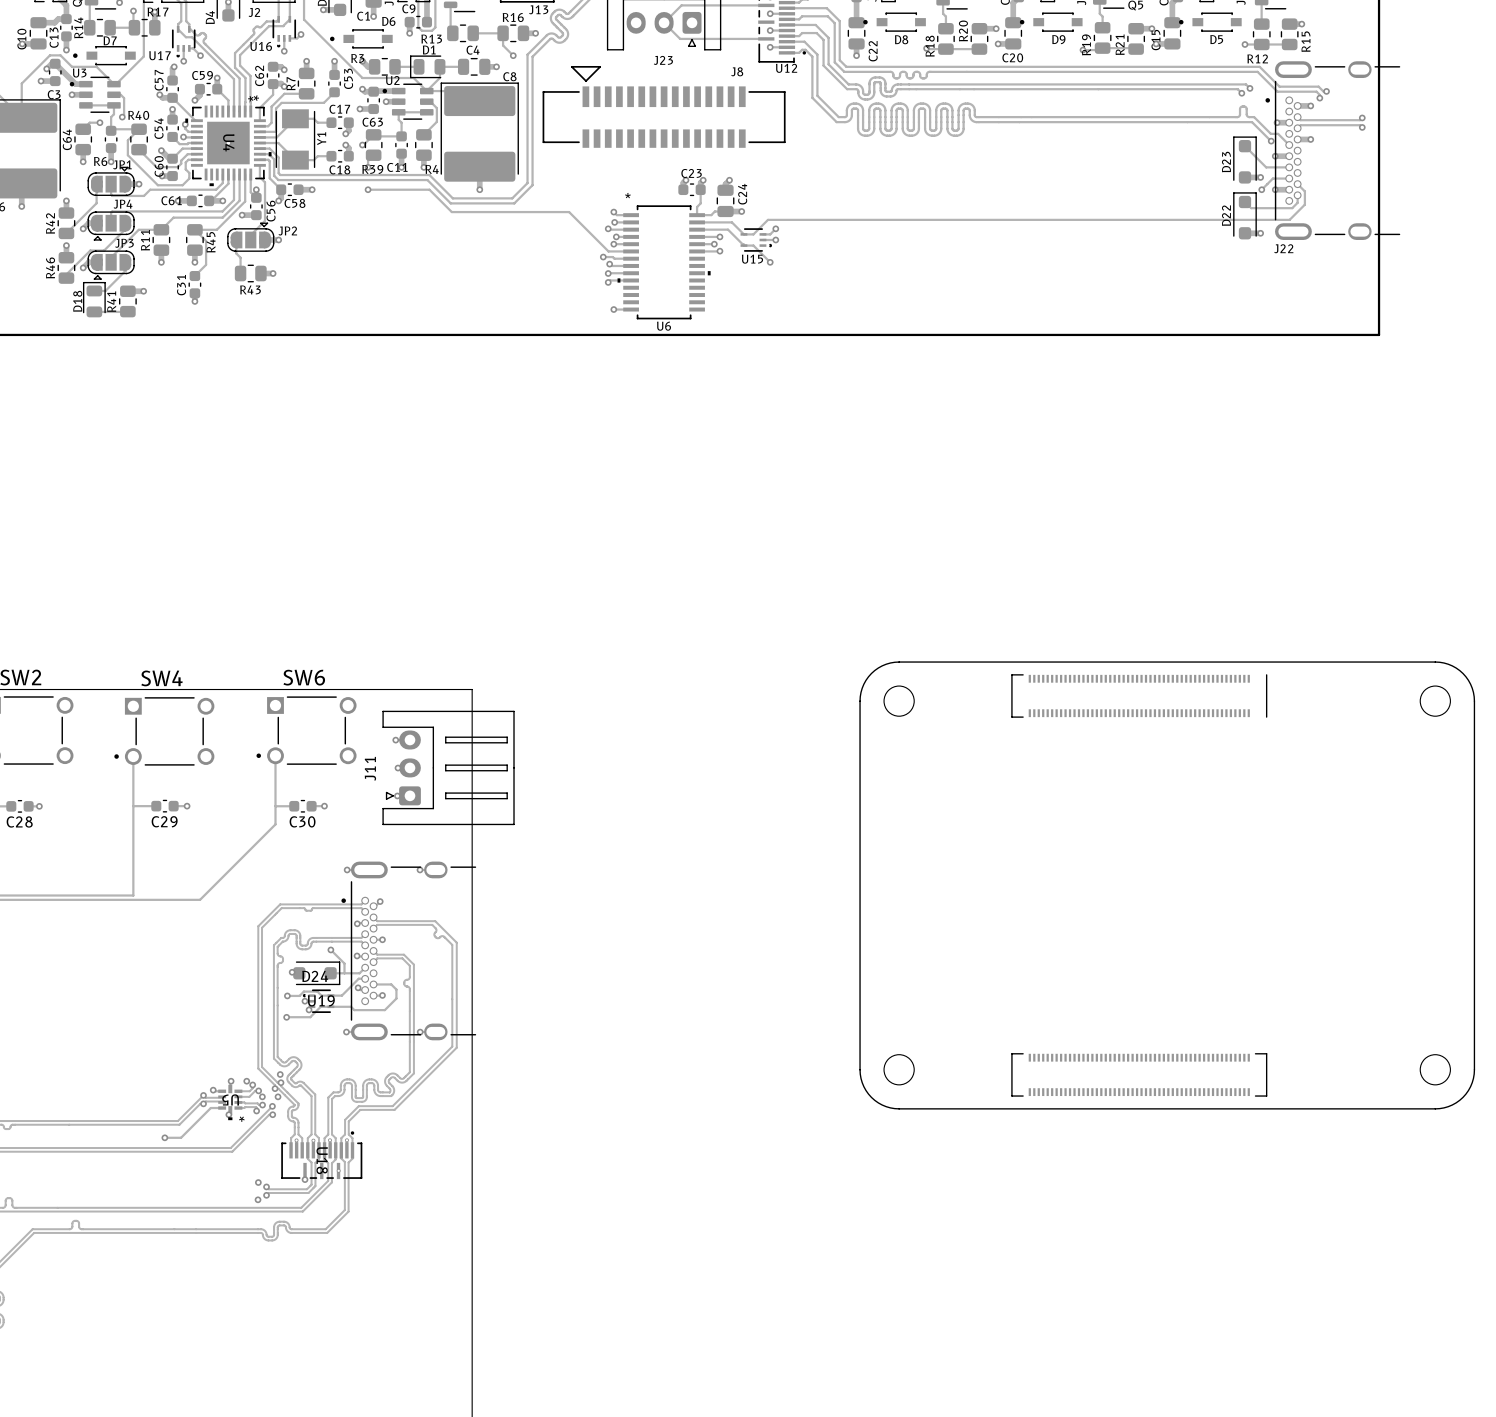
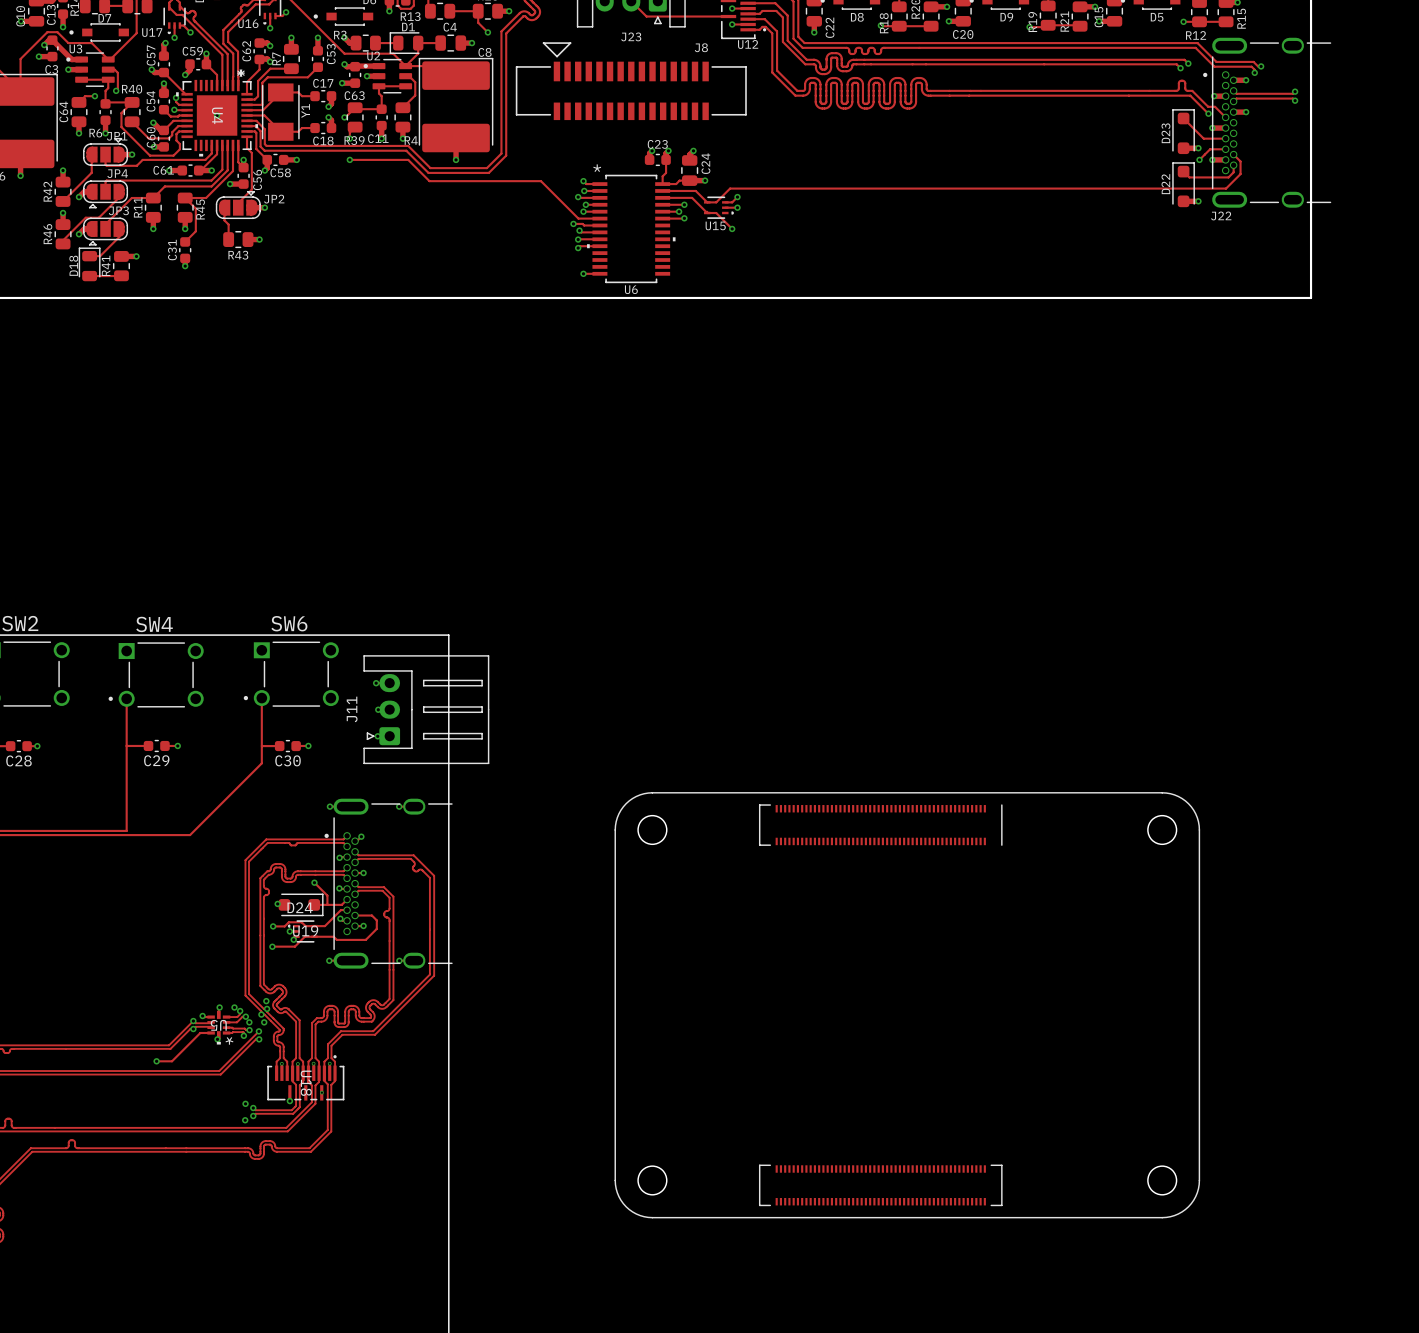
part: (1167, 885) -> none
part: none -> (907, 1005)

